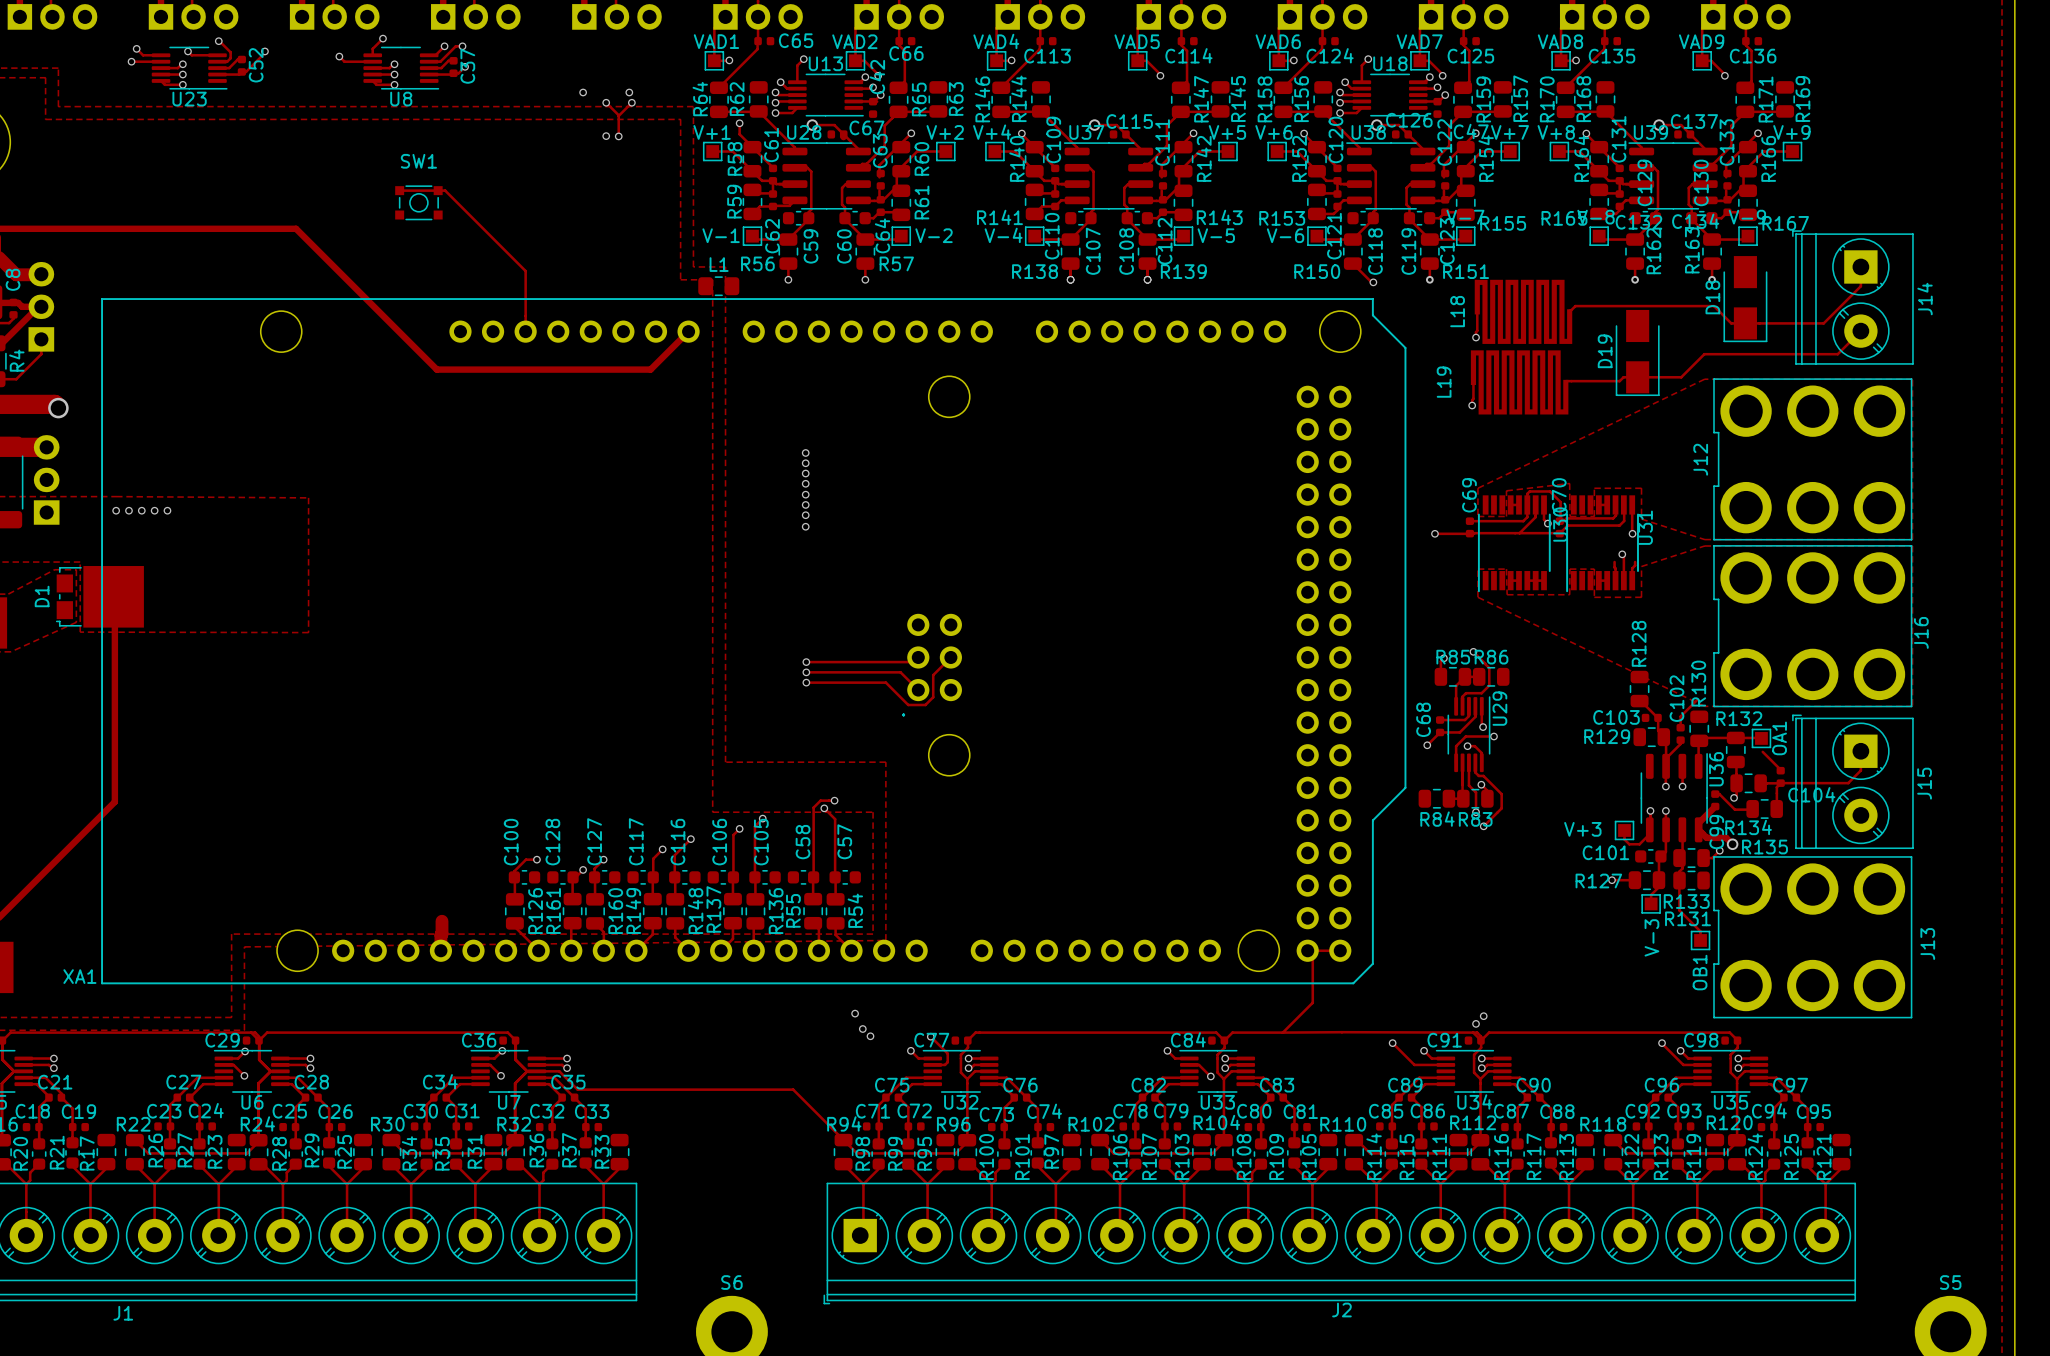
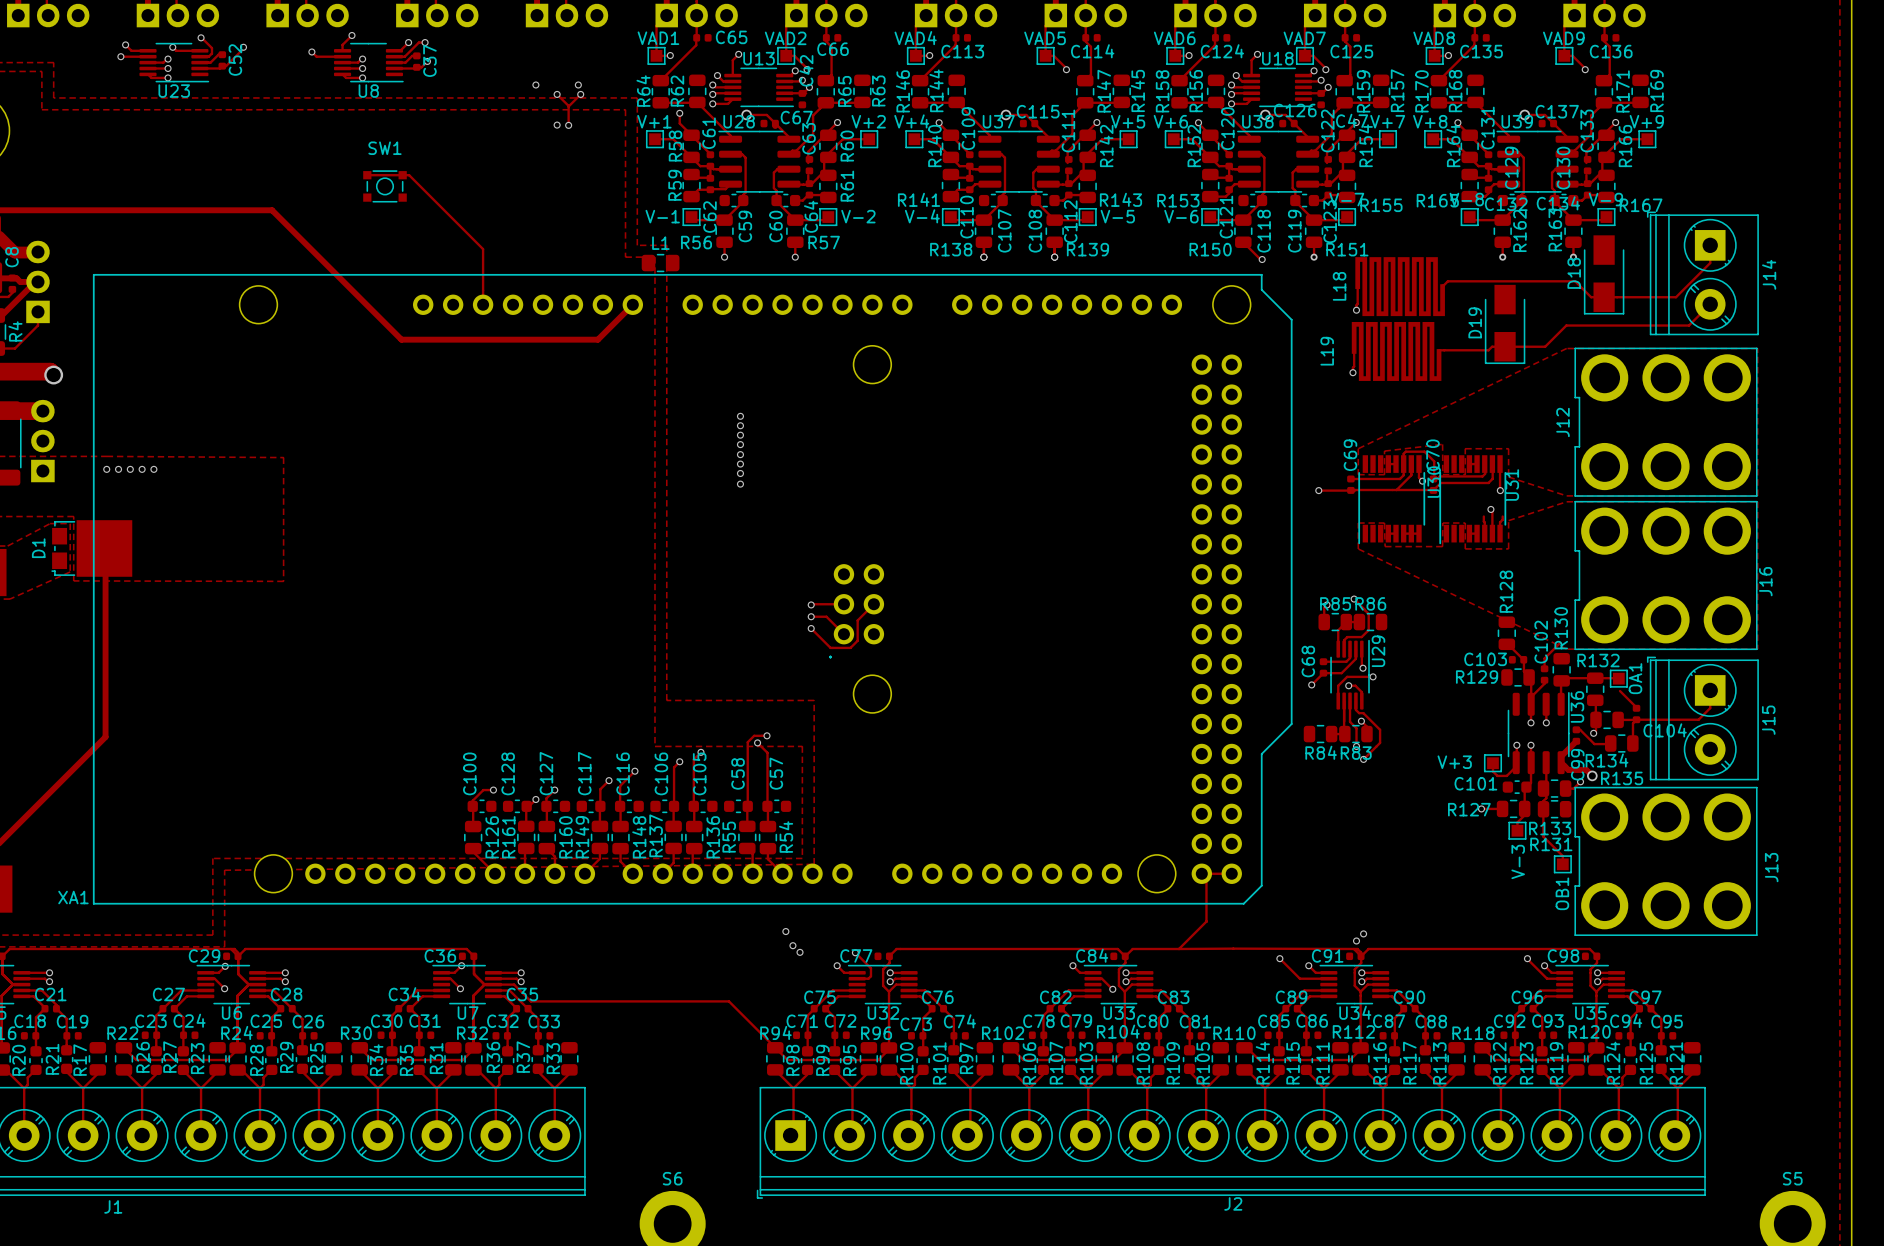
track: (918, 657) (913, 662) (806, 662) -> (843, 604) (811, 604)
via: none -> (811, 604)
via: (806, 662) -> none
via: none -> (811, 616)
track: (806, 672) (900, 672) -> (811, 616) (827, 617)
via: (806, 672) -> none
track: (806, 682) (885, 682) (908, 704) -> (811, 628) (830, 647) (834, 647)
via: (806, 682) -> none
via: none -> (811, 628)
track: (442, 921) (440, 950) -> none

